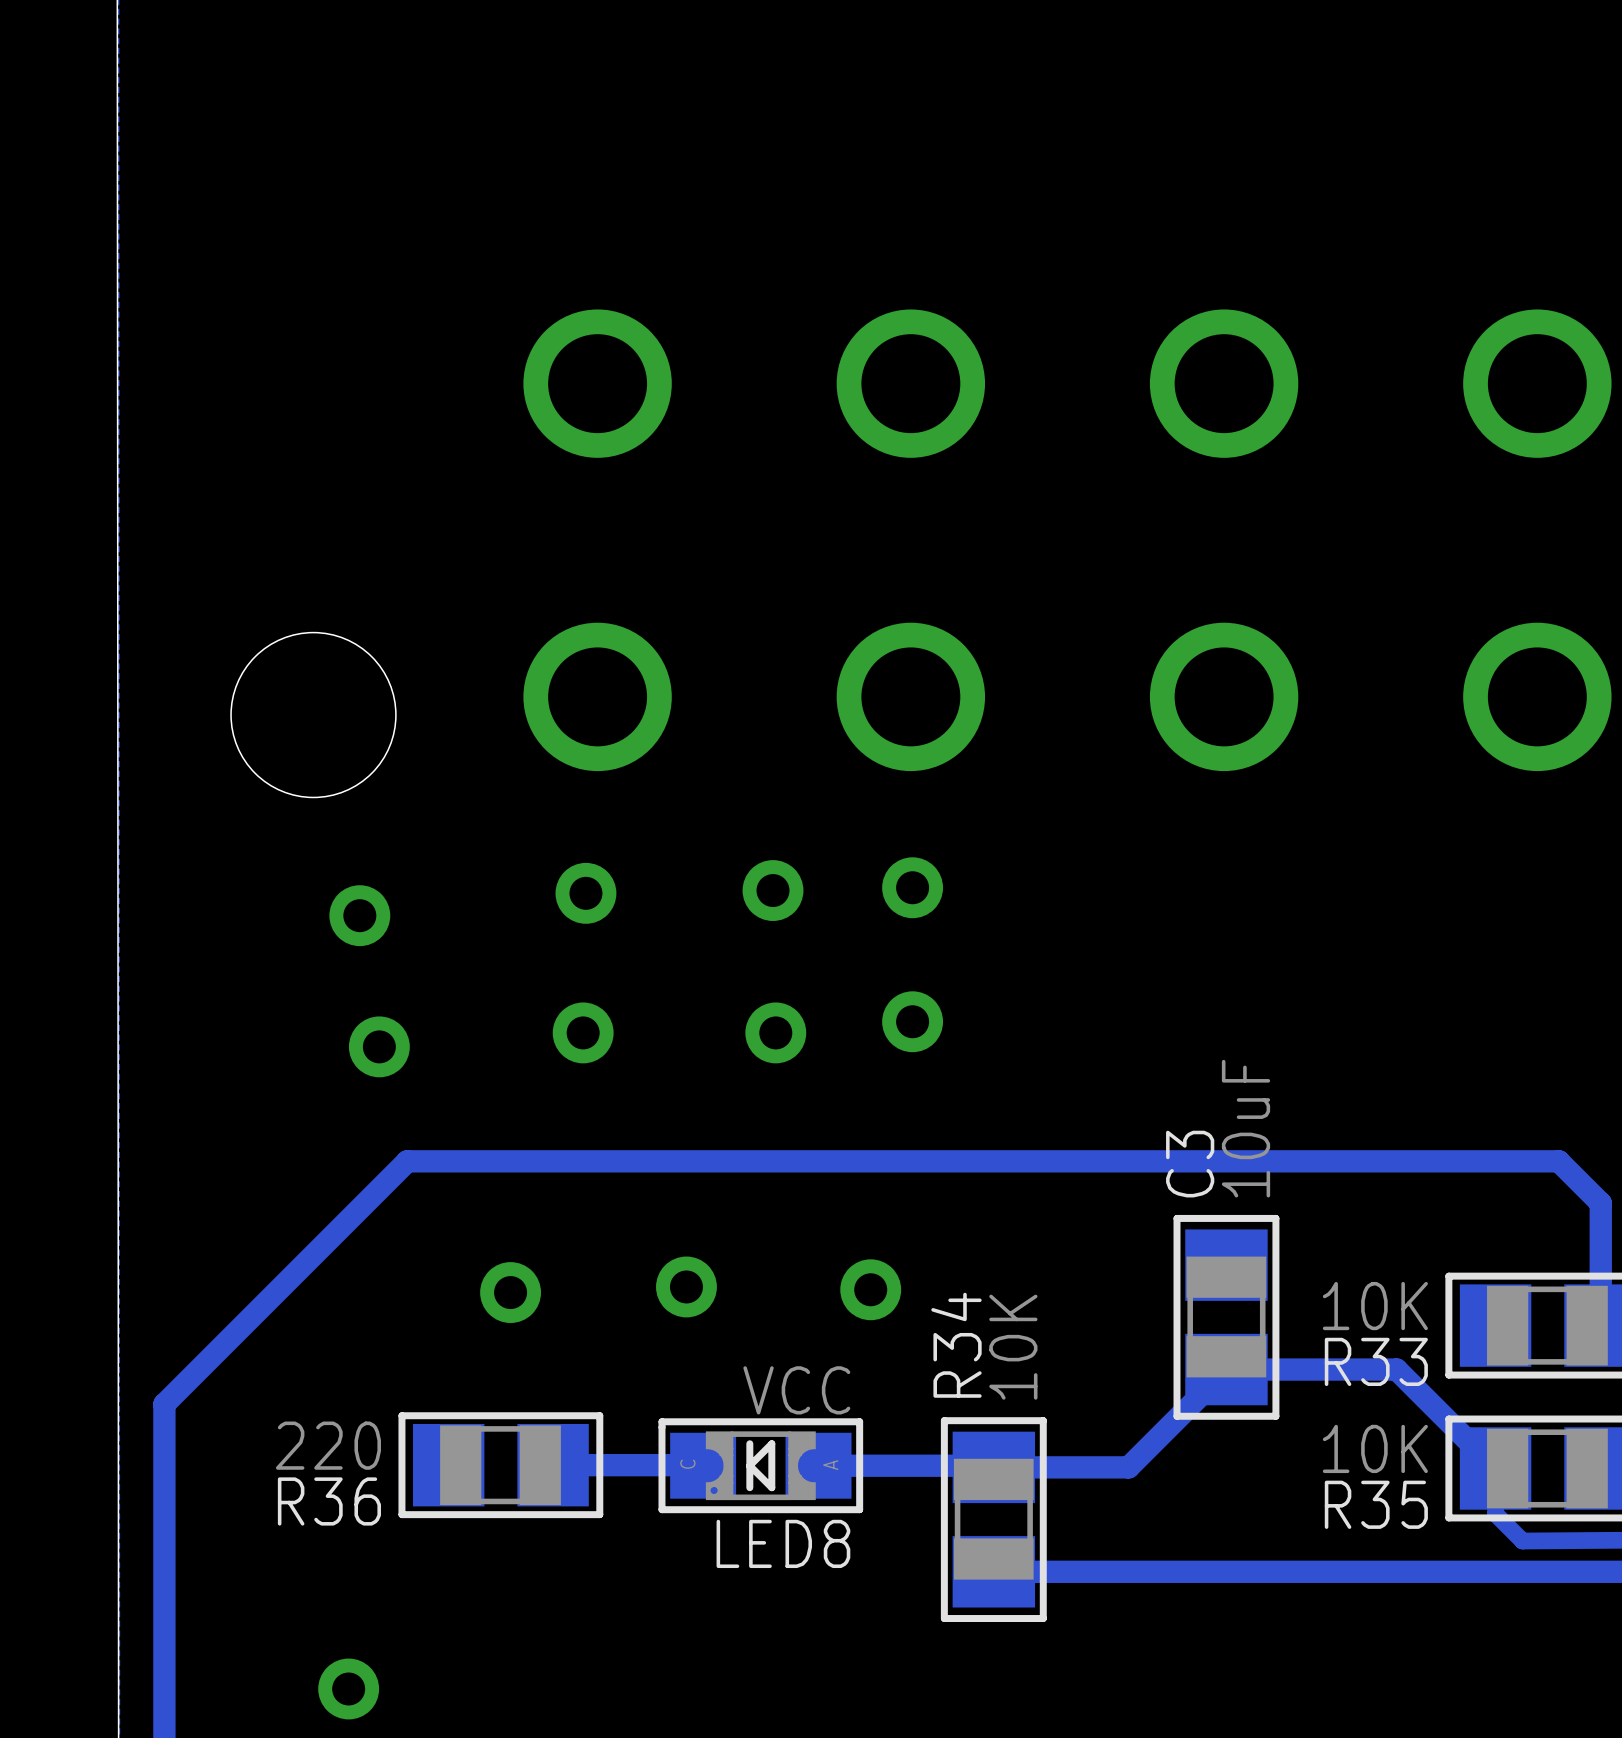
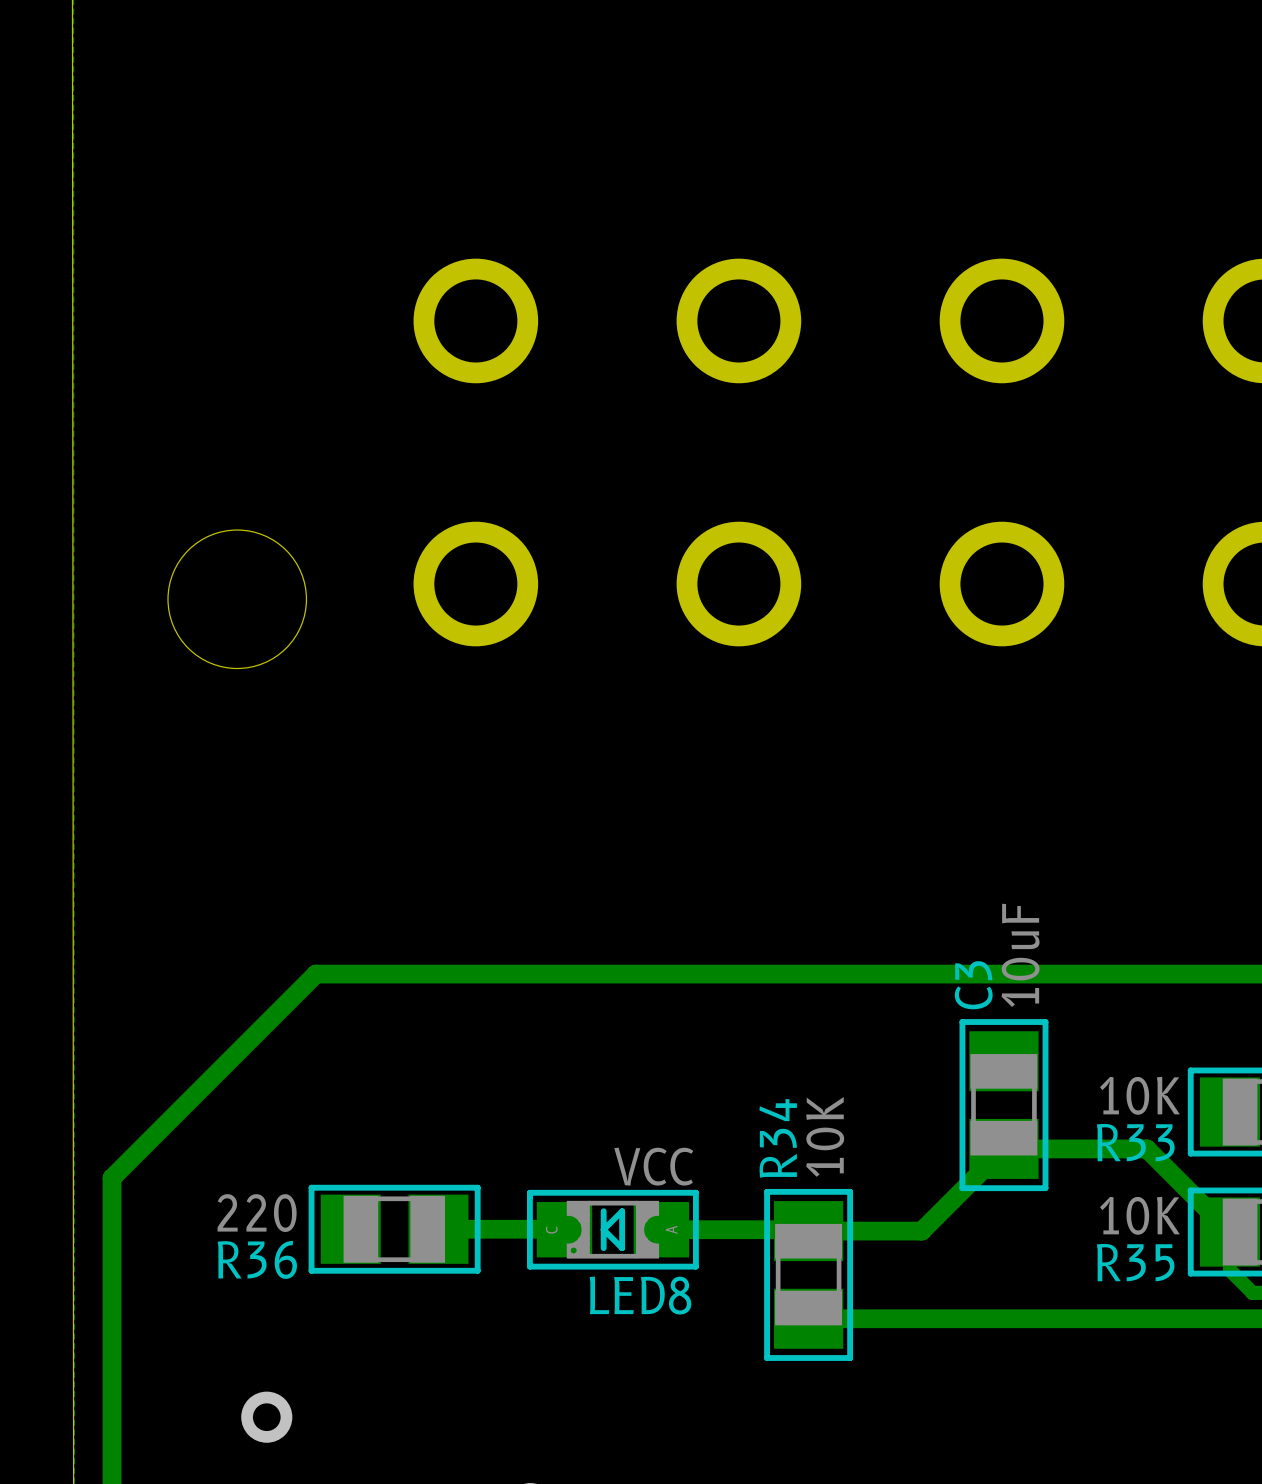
via: (912, 887) -> none
via: (773, 890) -> none
via: (585, 893) -> none
via: (359, 915) -> none
via: (912, 1021) -> none
via: (583, 1032) -> none
via: (775, 1032) -> none
via: (379, 1046) -> none
via: (686, 1286) -> none
via: (870, 1289) -> none
via: (510, 1292) -> none

